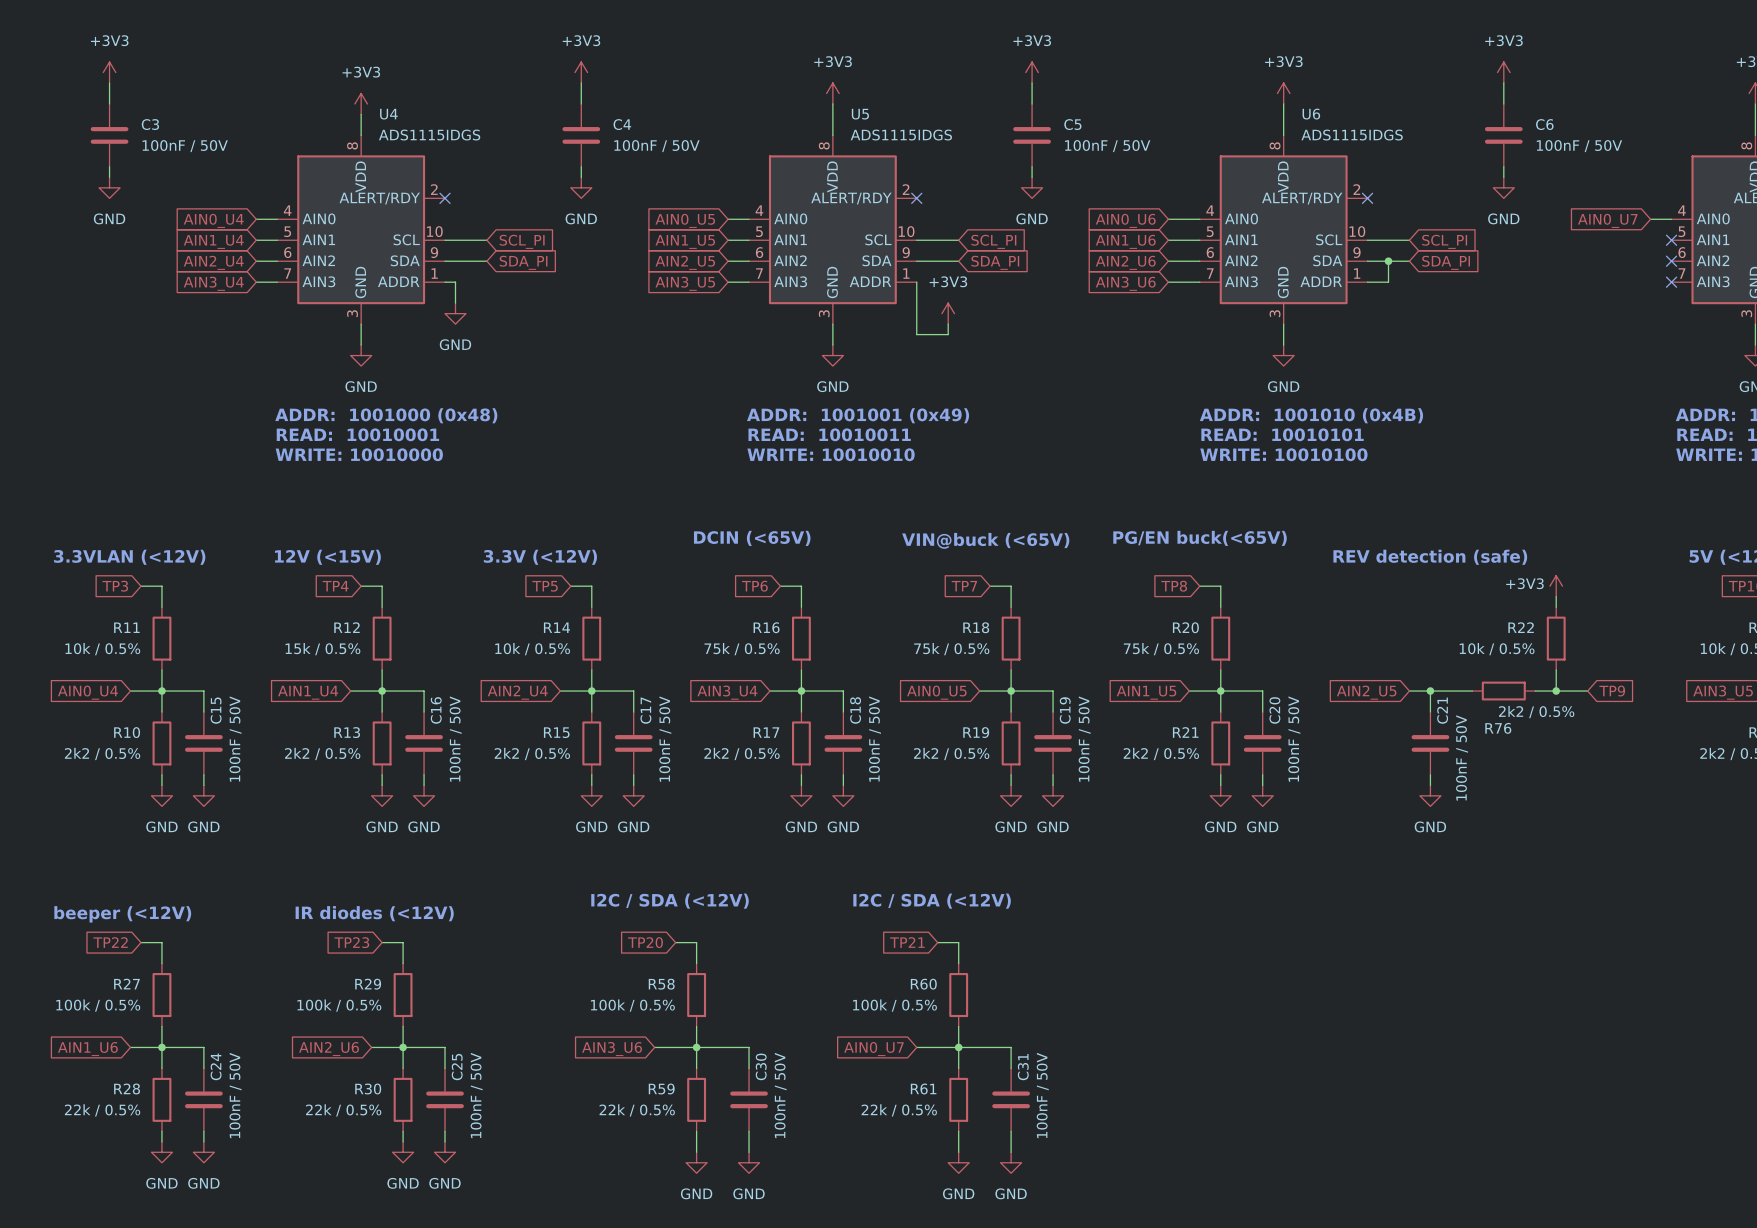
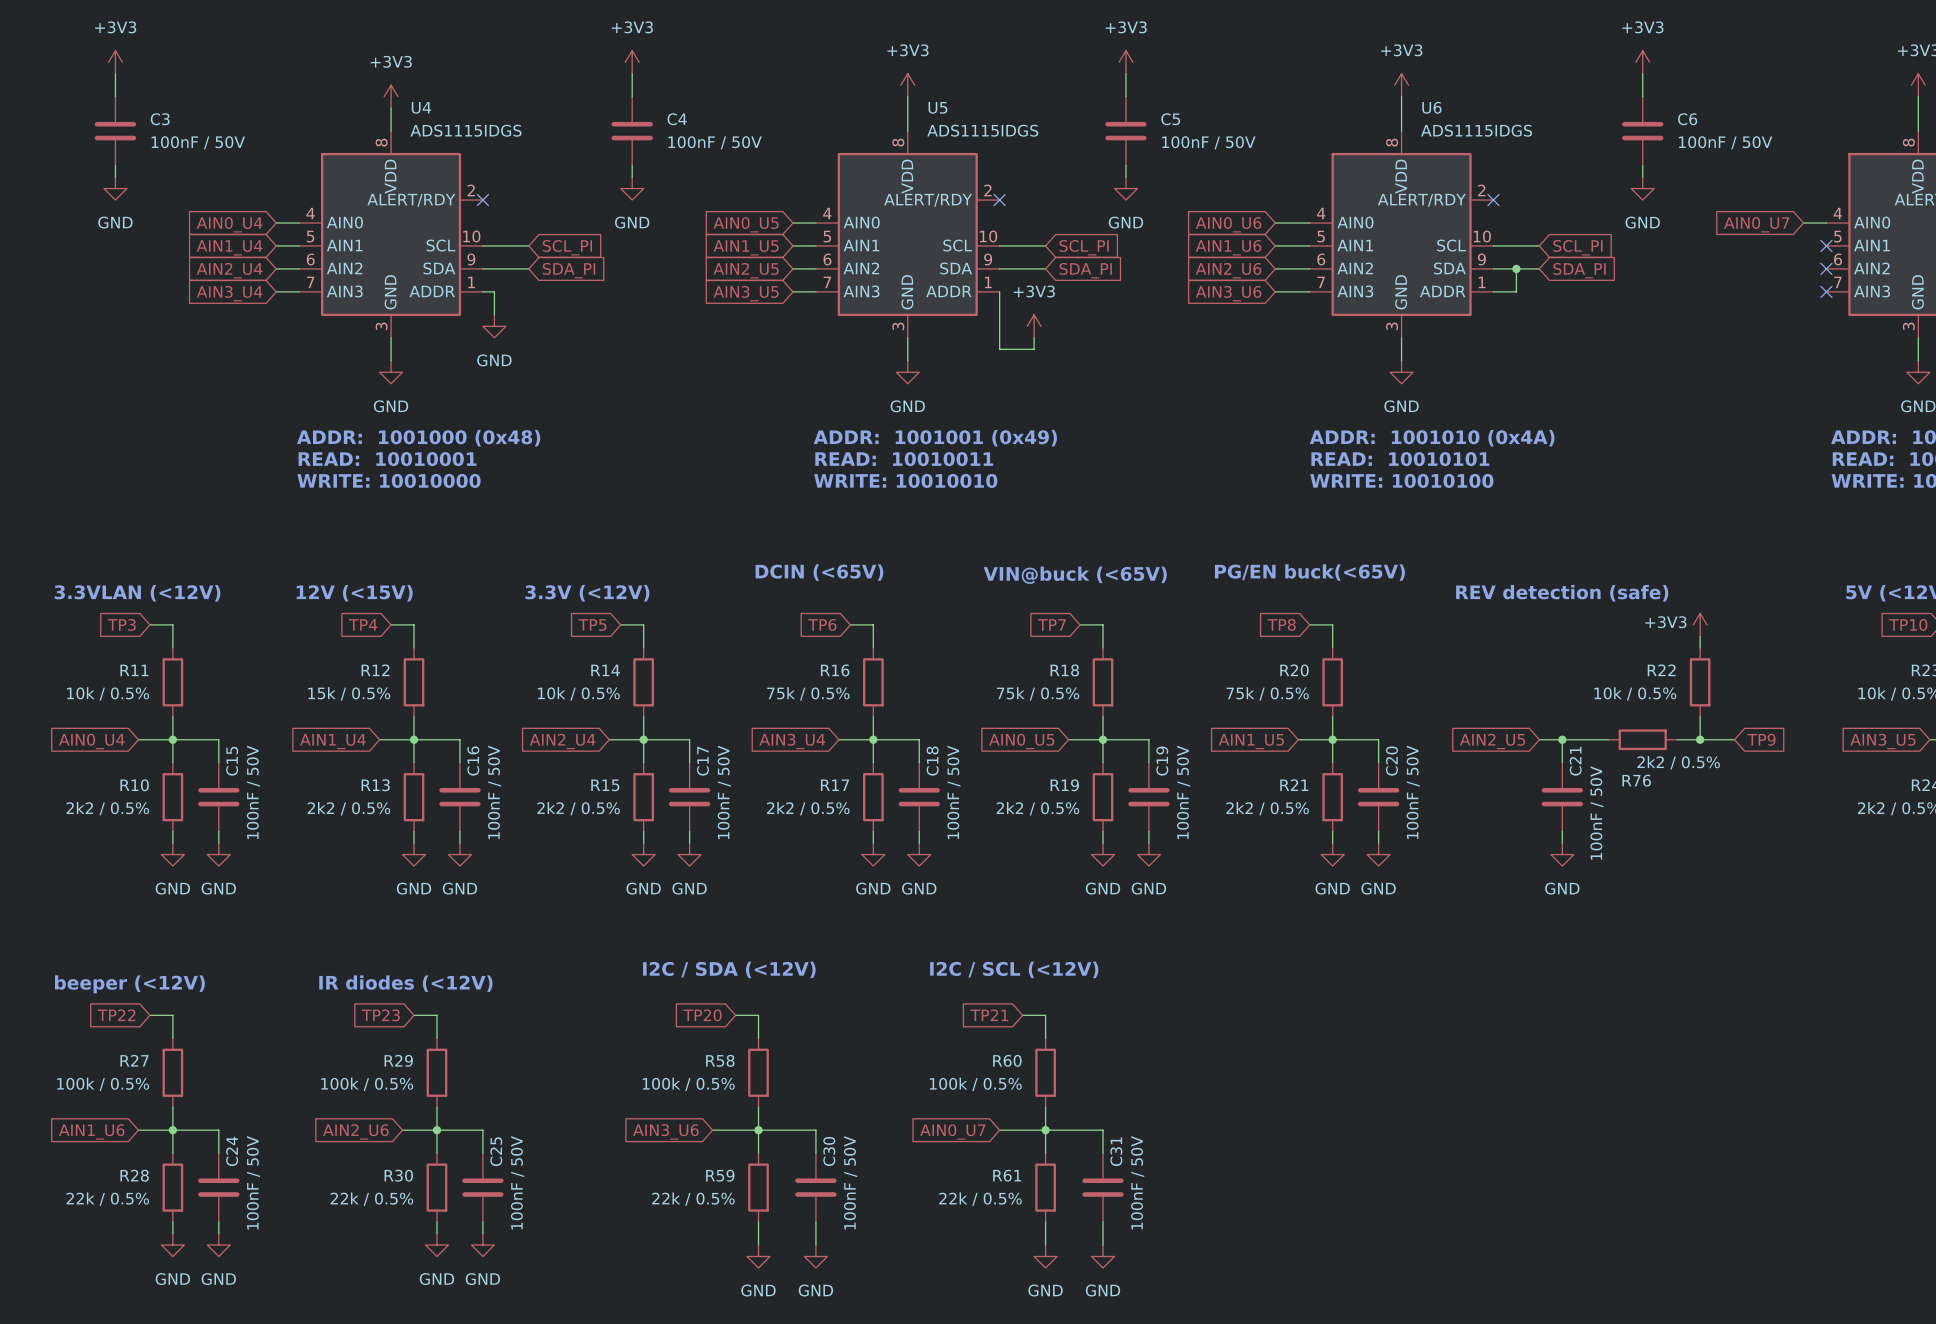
text: ADDR: 1001010 (0x4B) (1311, 415) -> ADDR: 1001010 (0x4A) (1432, 438)
text: I2C / SDA (<12V) (932, 901) -> I2C / SCL (<12V) (1014, 969)

